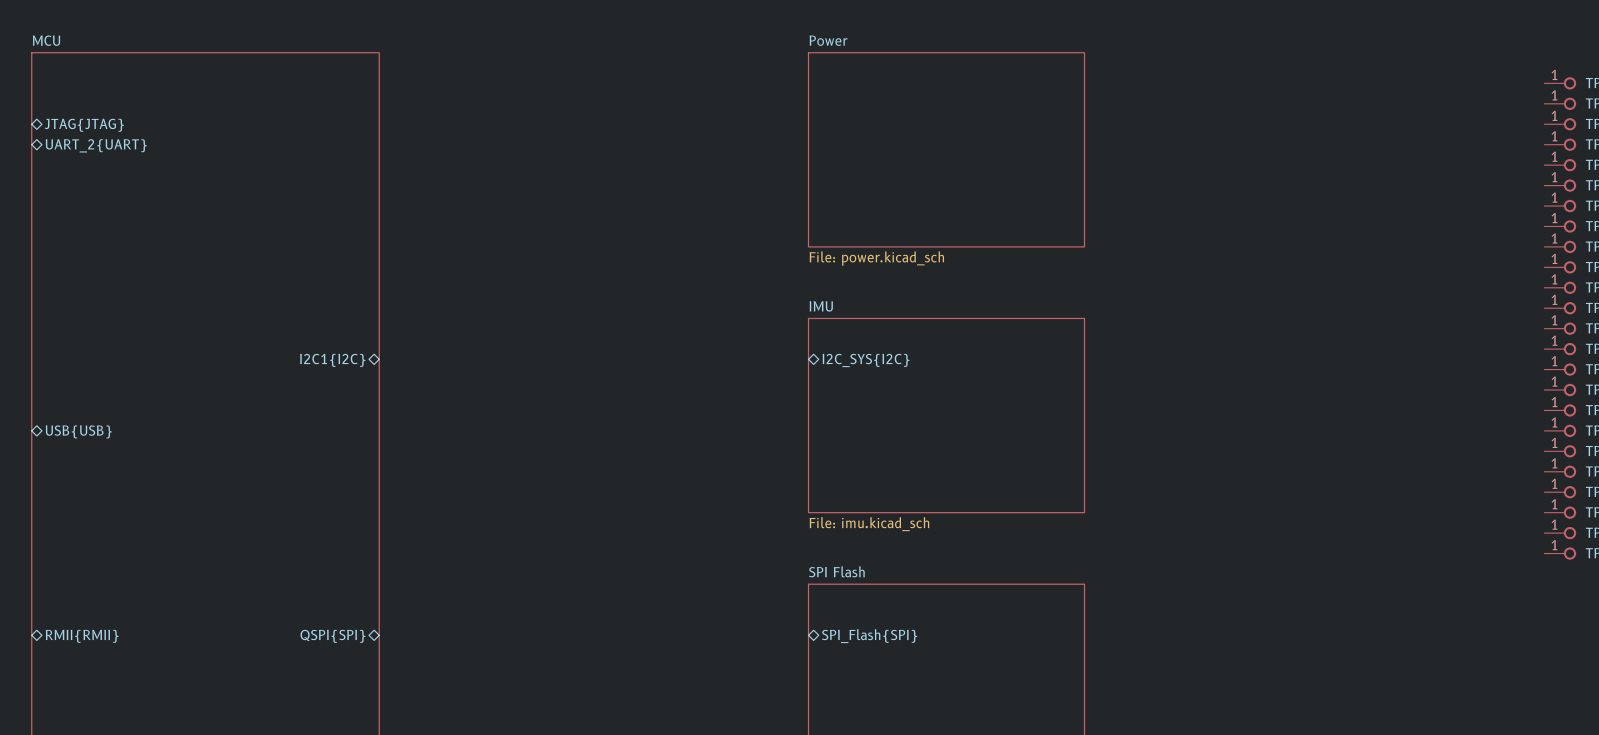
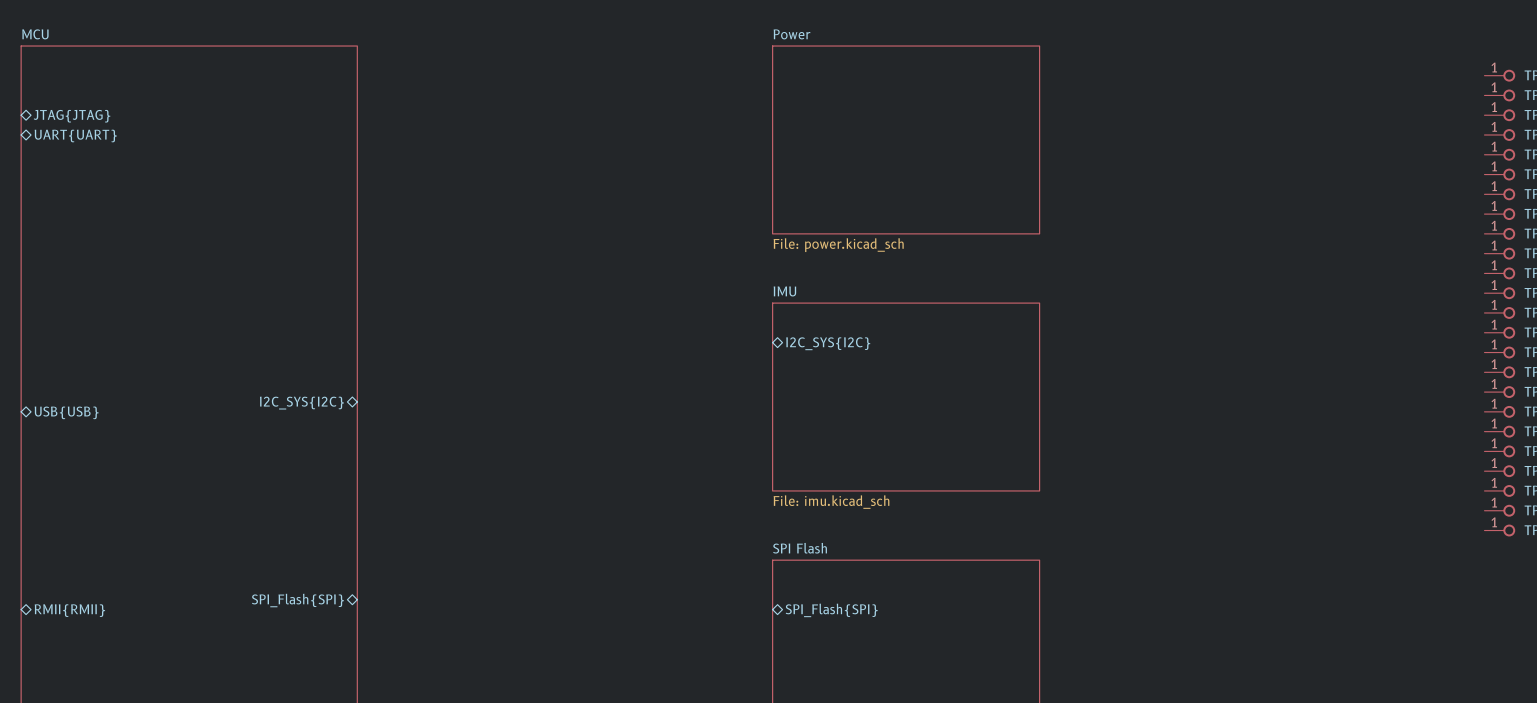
sheet pin: UART_2{UART} (96, 145) -> UART{UART} (75, 135)
sheet pin: I2C1{I2C} (332, 360) -> none
sheet pin: none -> I2C_SYS{I2C} (301, 403)
sheet pin: QSPI{SPI} (332, 636) -> SPI_Flash{SPI} (297, 600)

